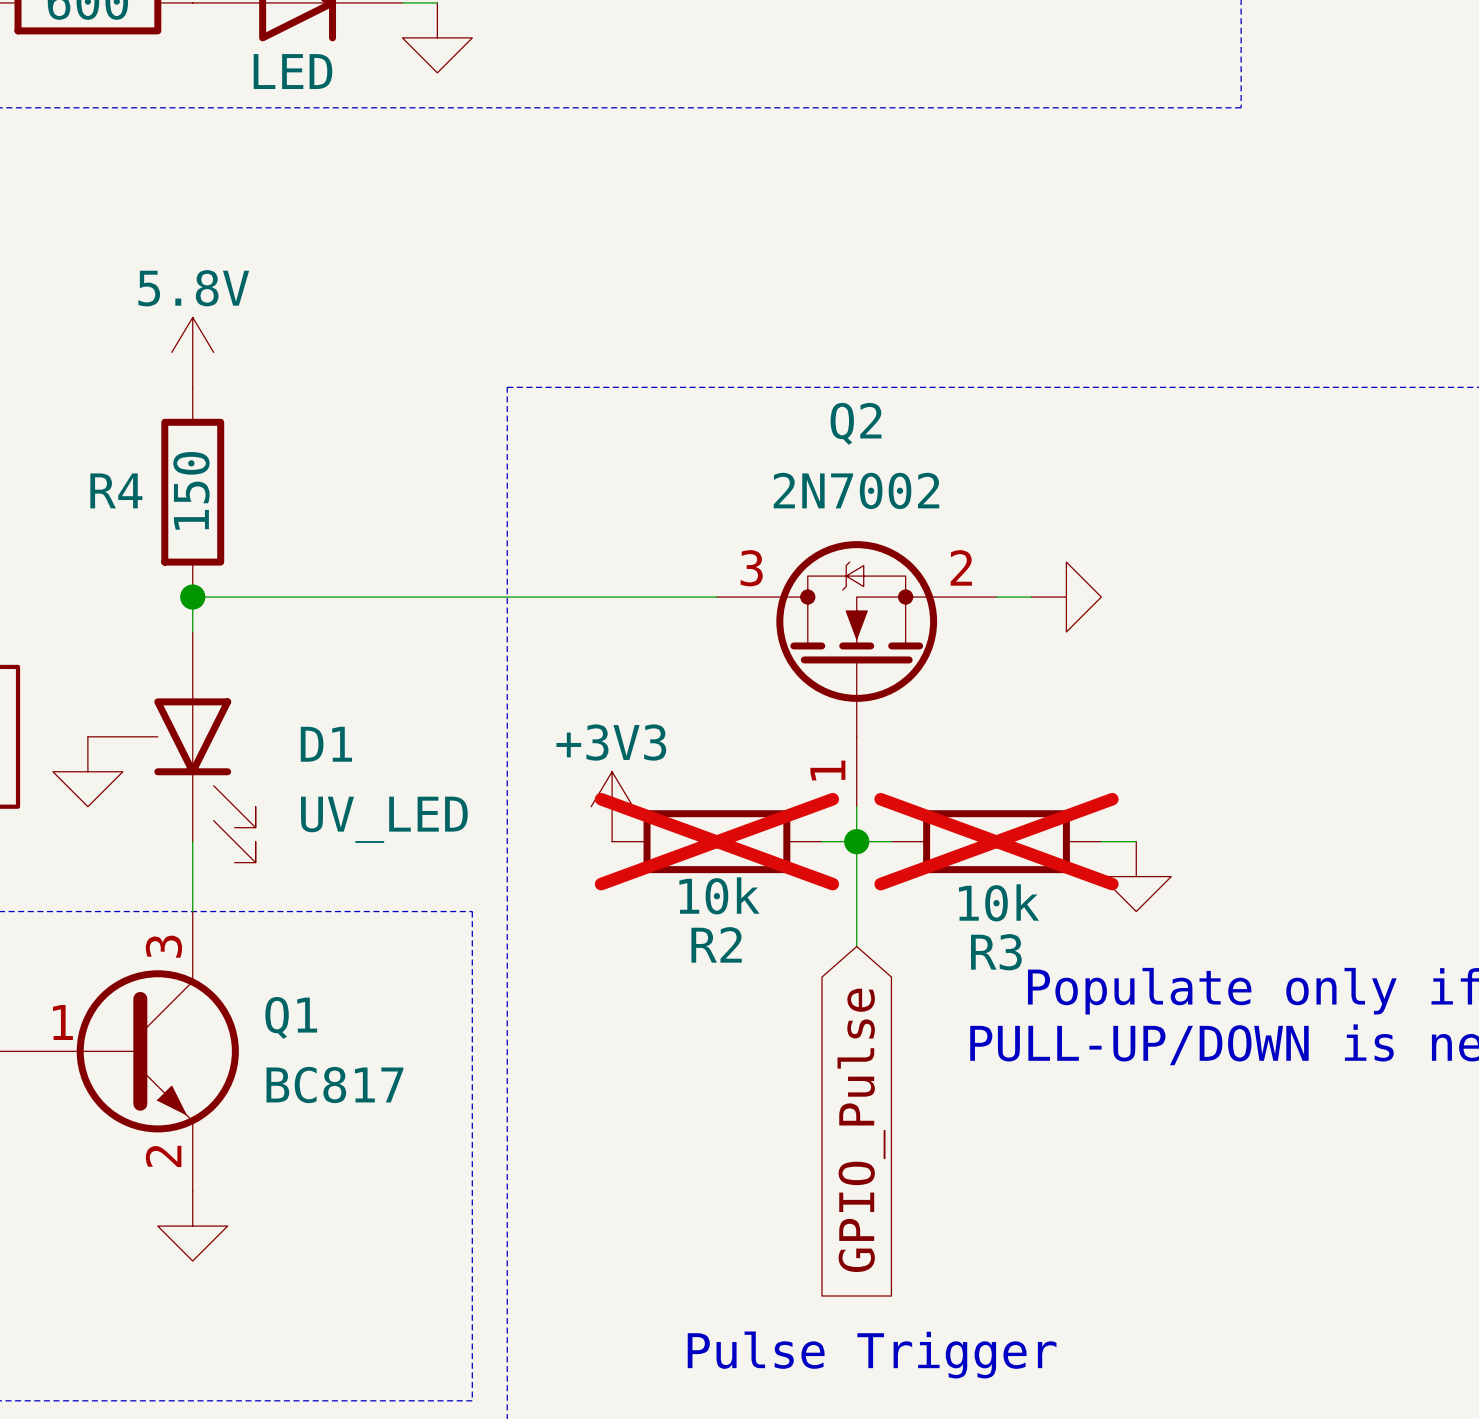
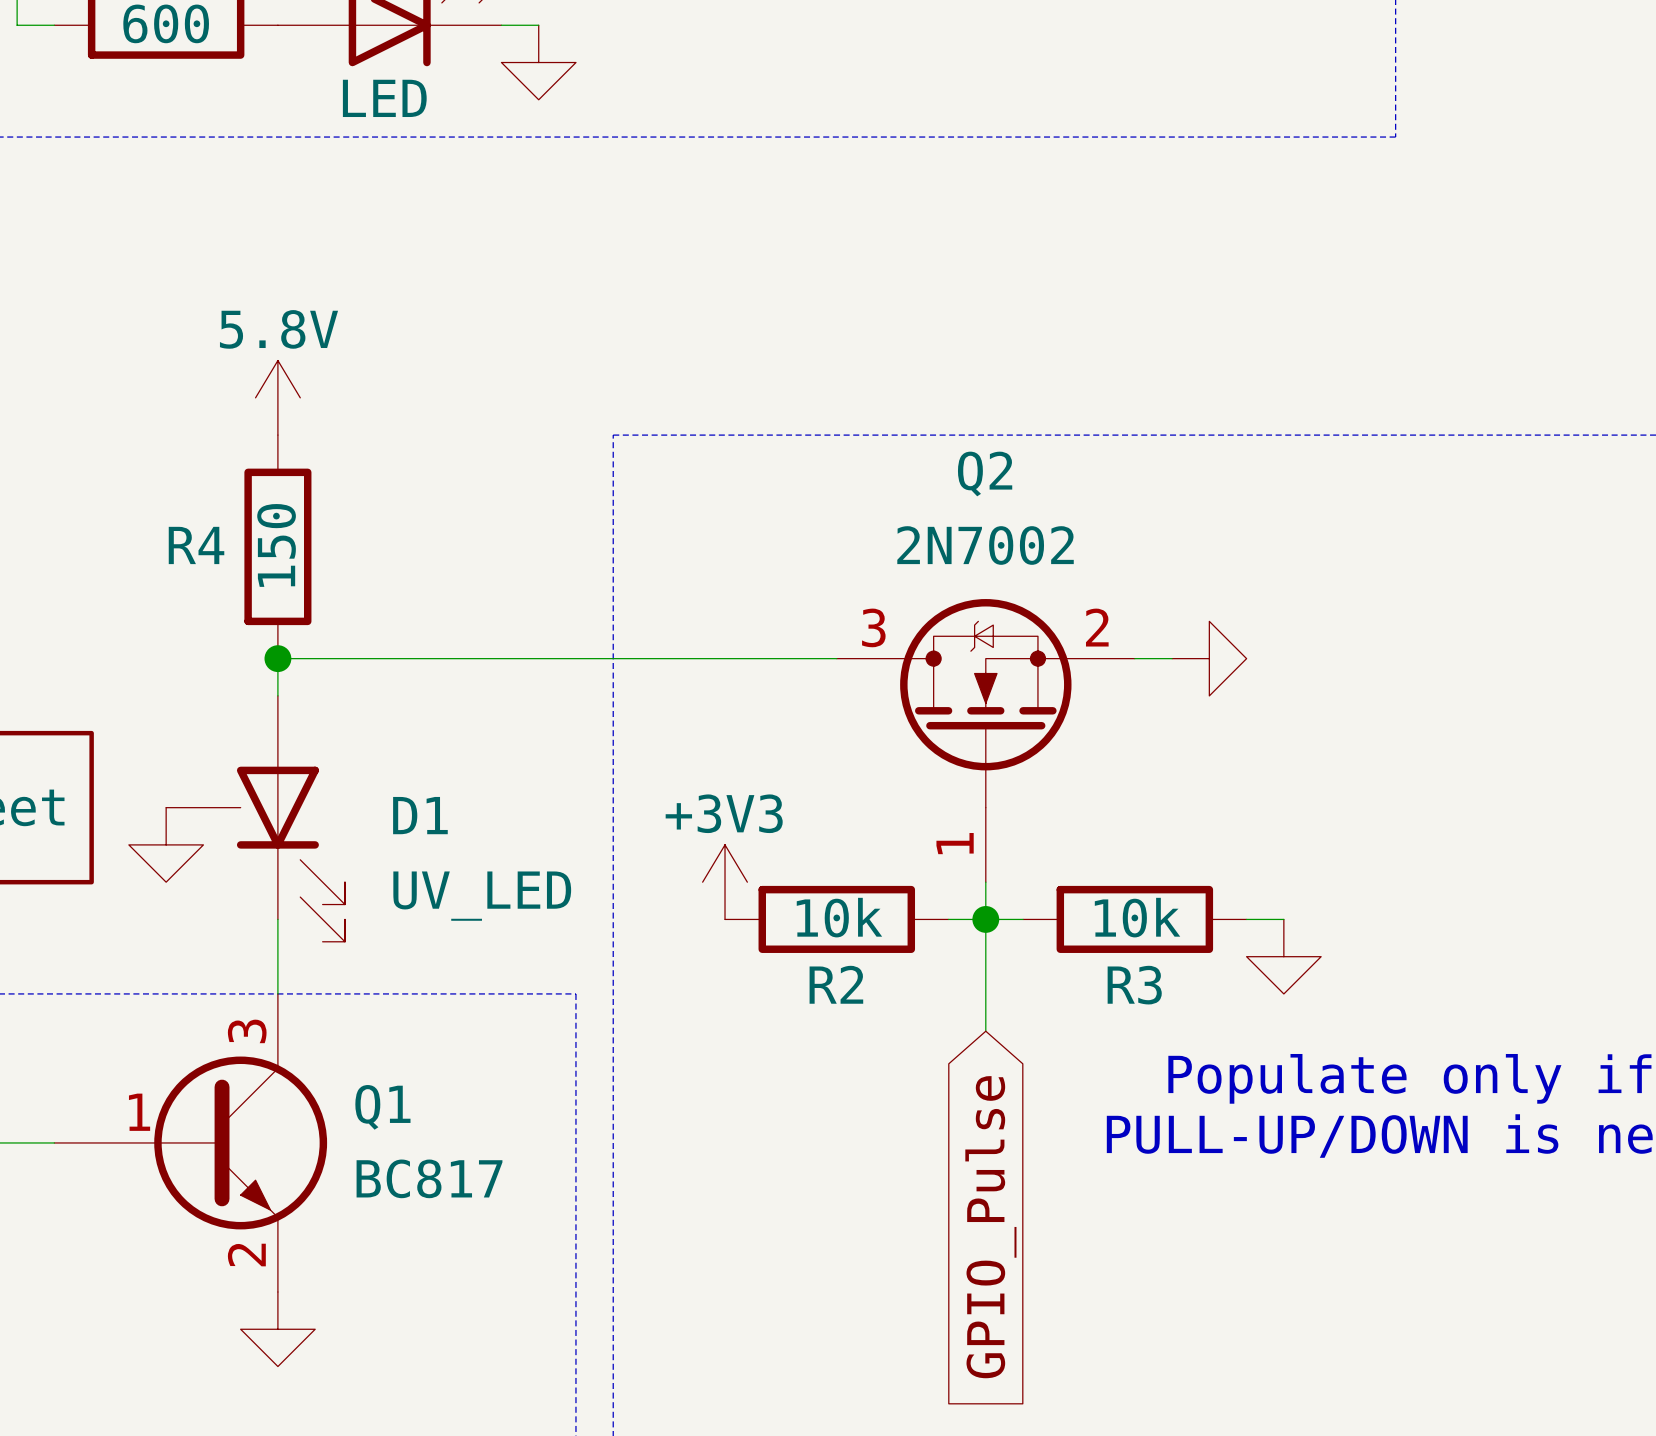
R2 do-not-place cross: (716, 841) -> none
R3 do-not-place cross: (996, 841) -> none
R2 value position: 10k (719, 895) -> 10k (839, 917)
R3 value position: 10k (999, 902) -> 10k (1137, 917)
R2 name position: R2 (716, 944) -> R2 (836, 984)
R3 name position: R3 (996, 952) -> R3 (1134, 985)

